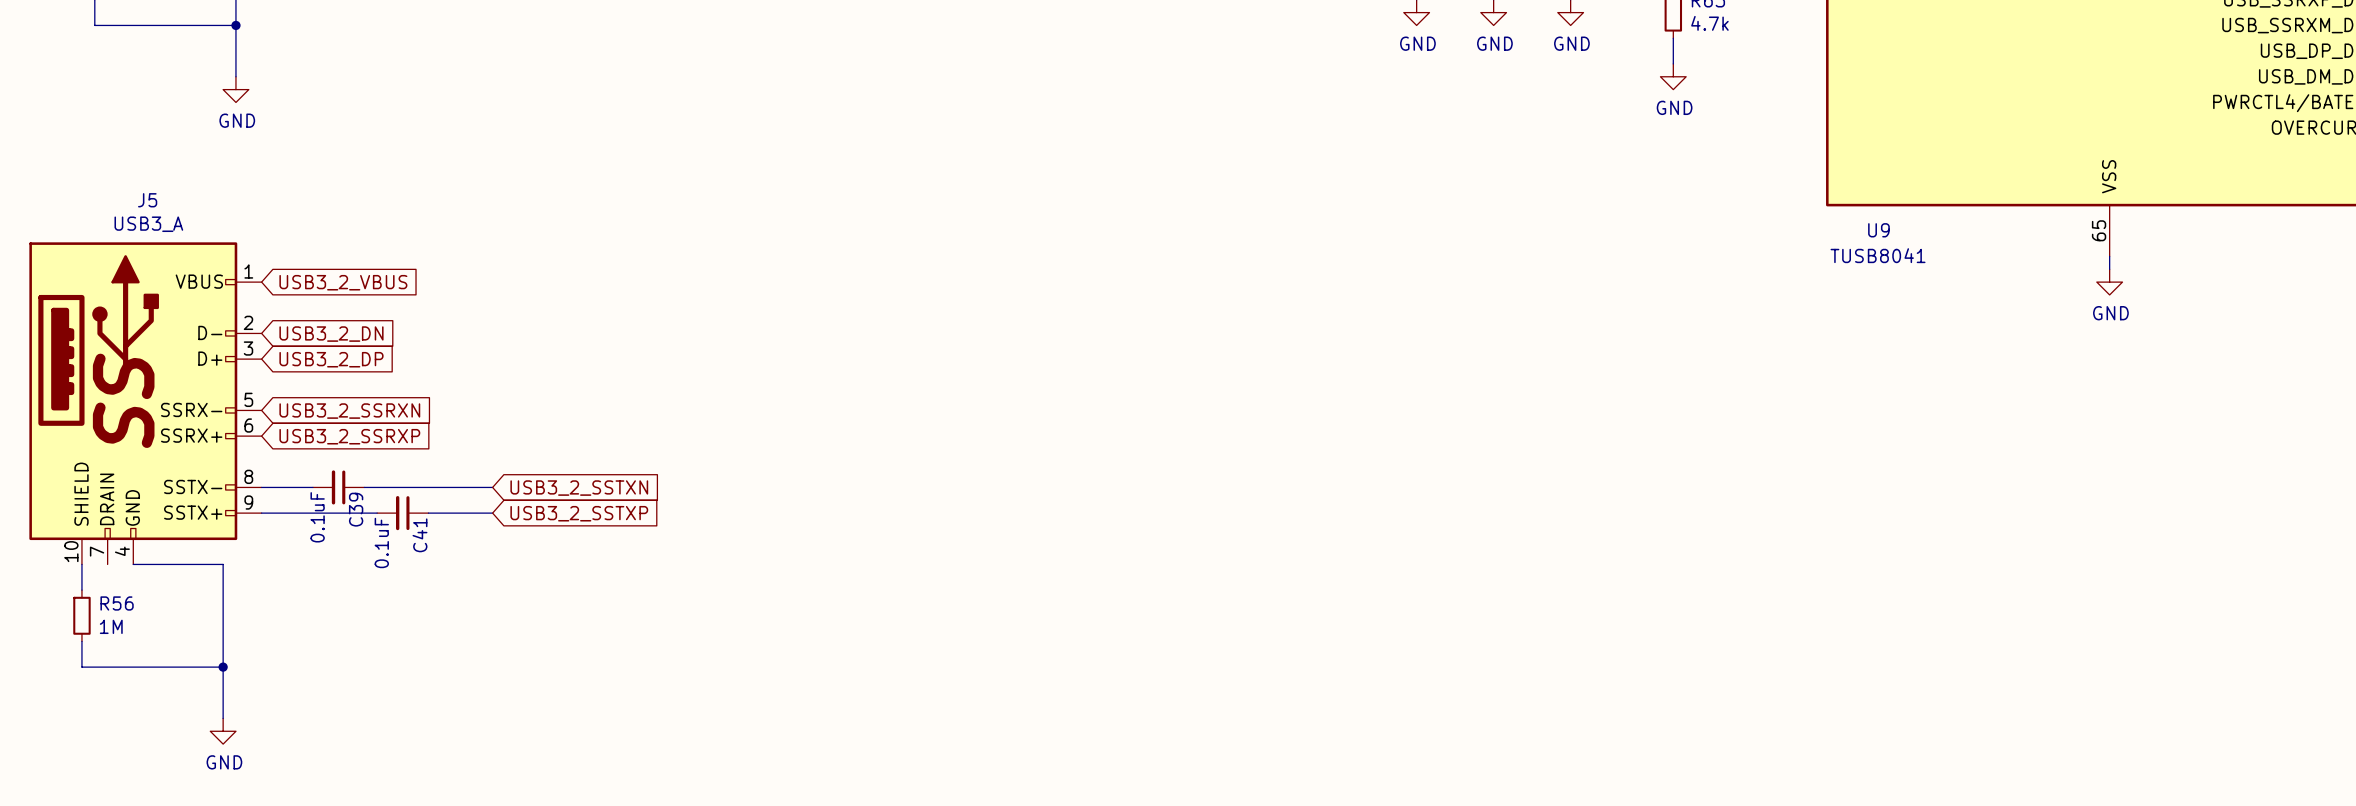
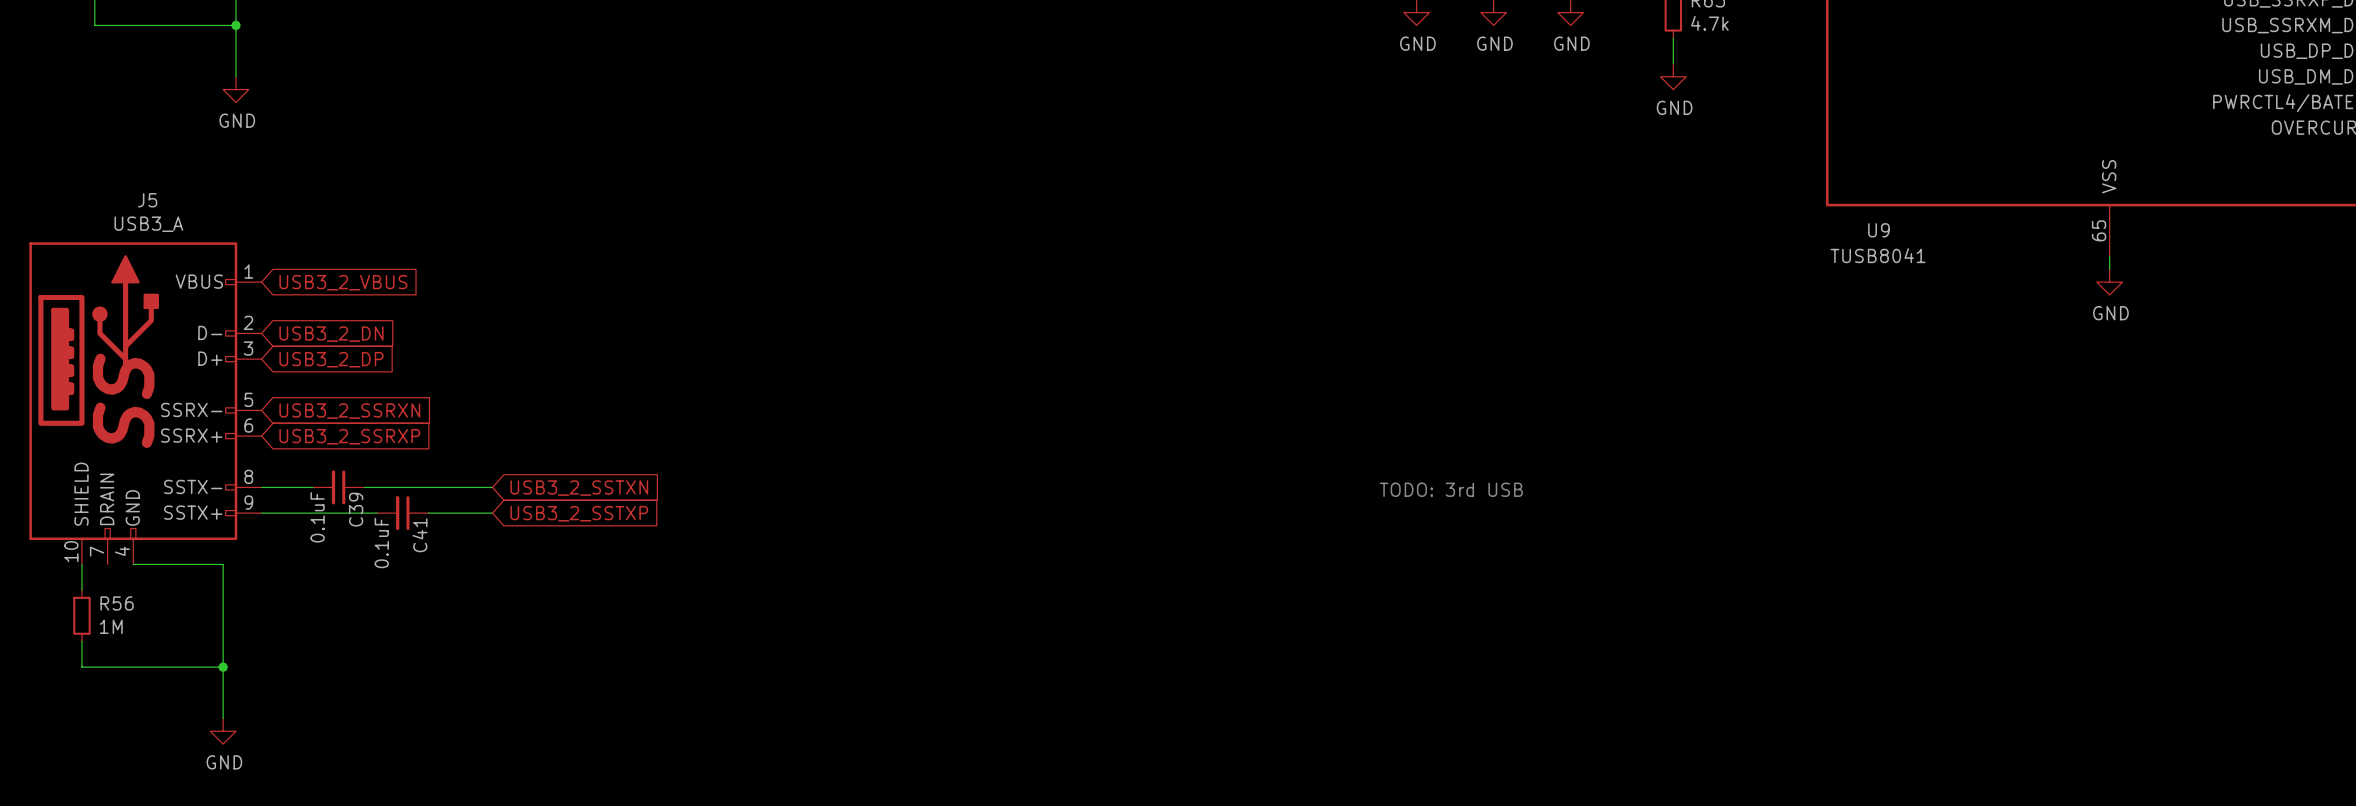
text: none -> TODO: 3rd USB (1451, 489)

